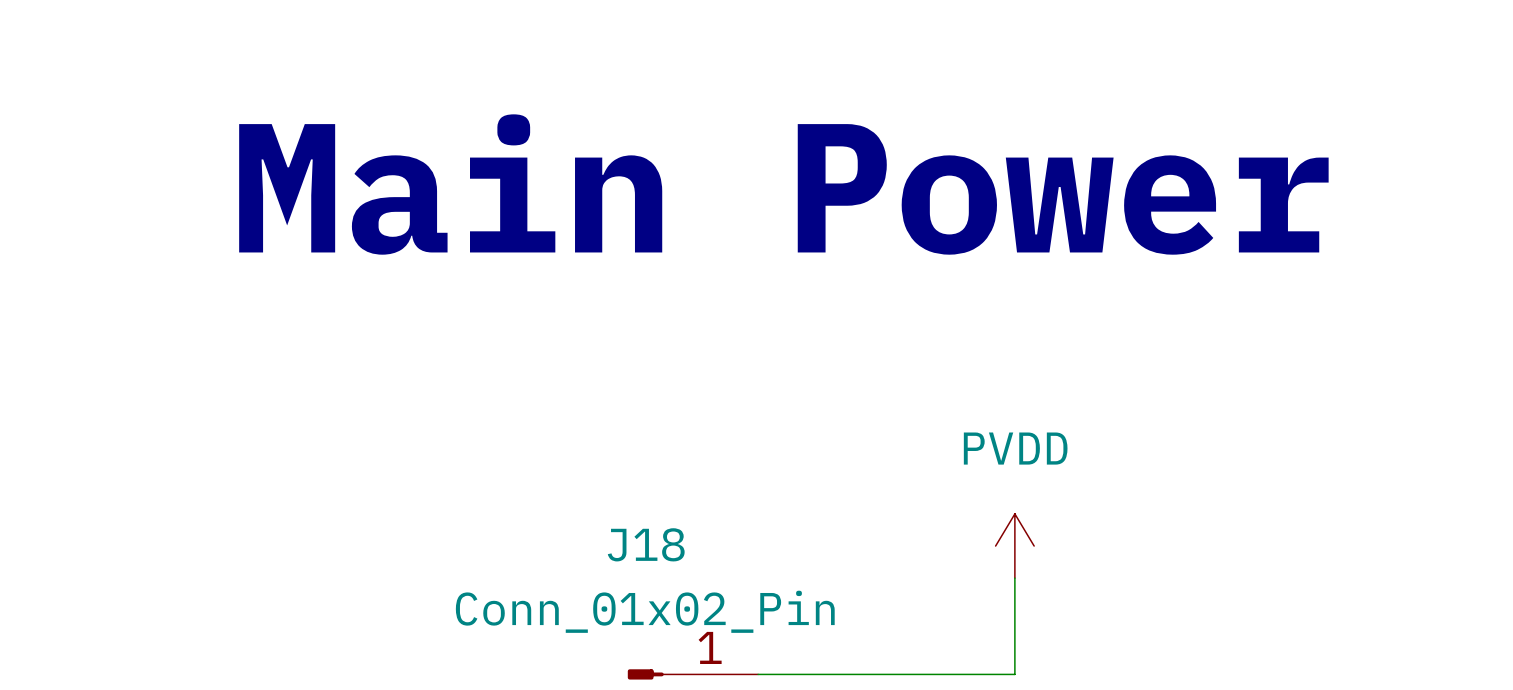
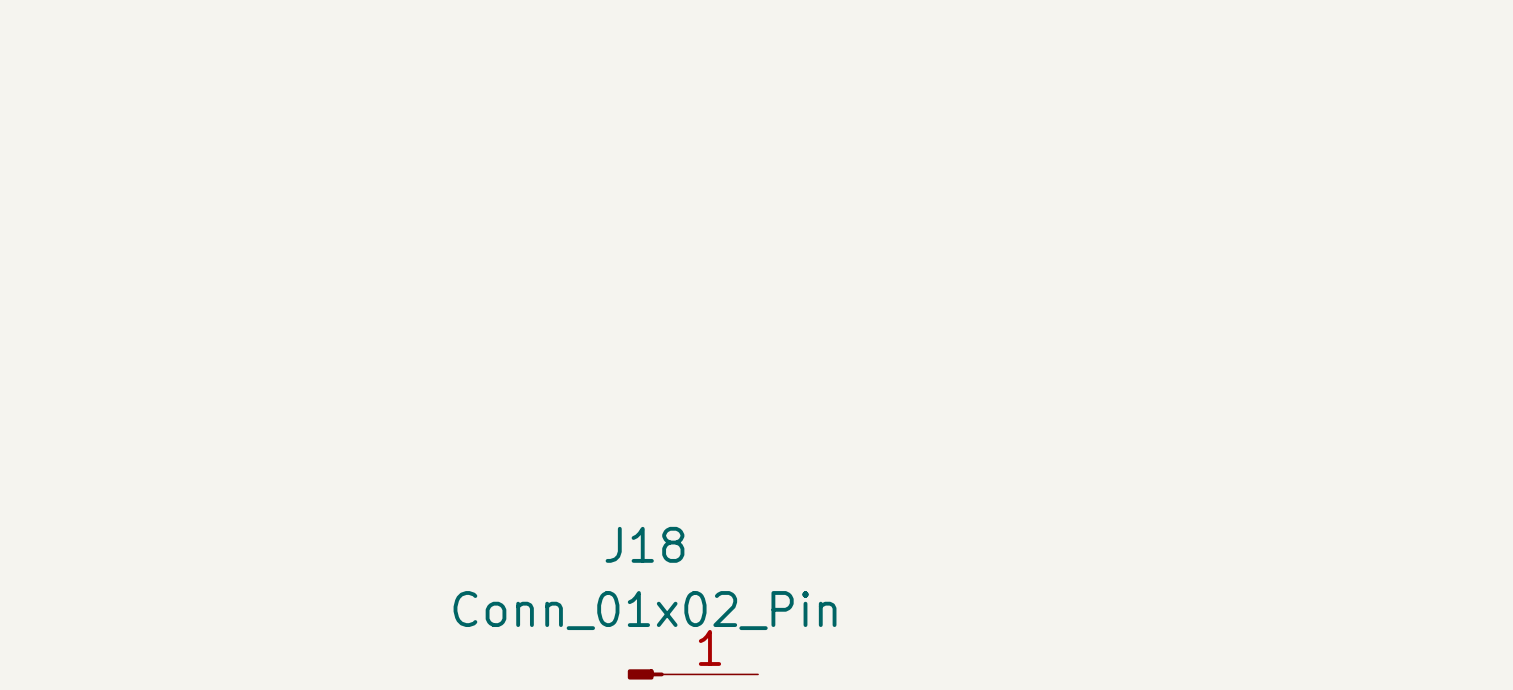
text: Main Power (783, 184) -> none
power symbol: PVDD (1014, 546) -> none
wire: (1014, 578) (1014, 674) (758, 674) -> none

